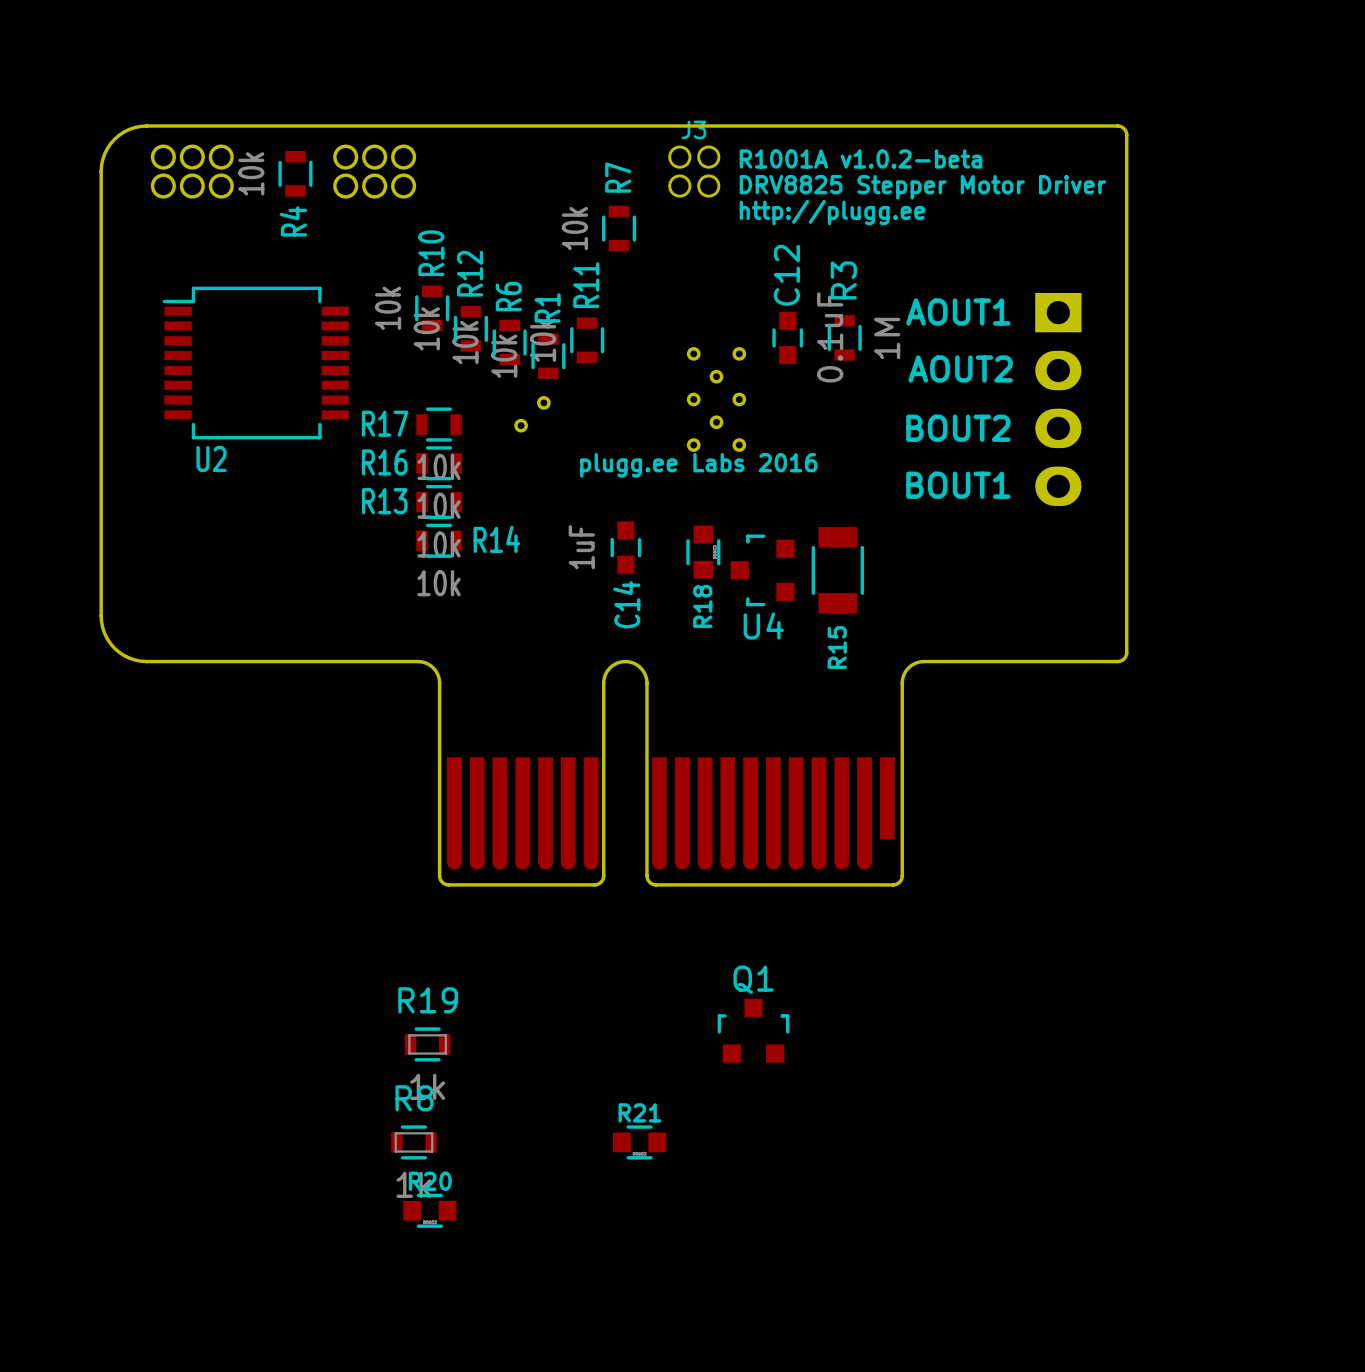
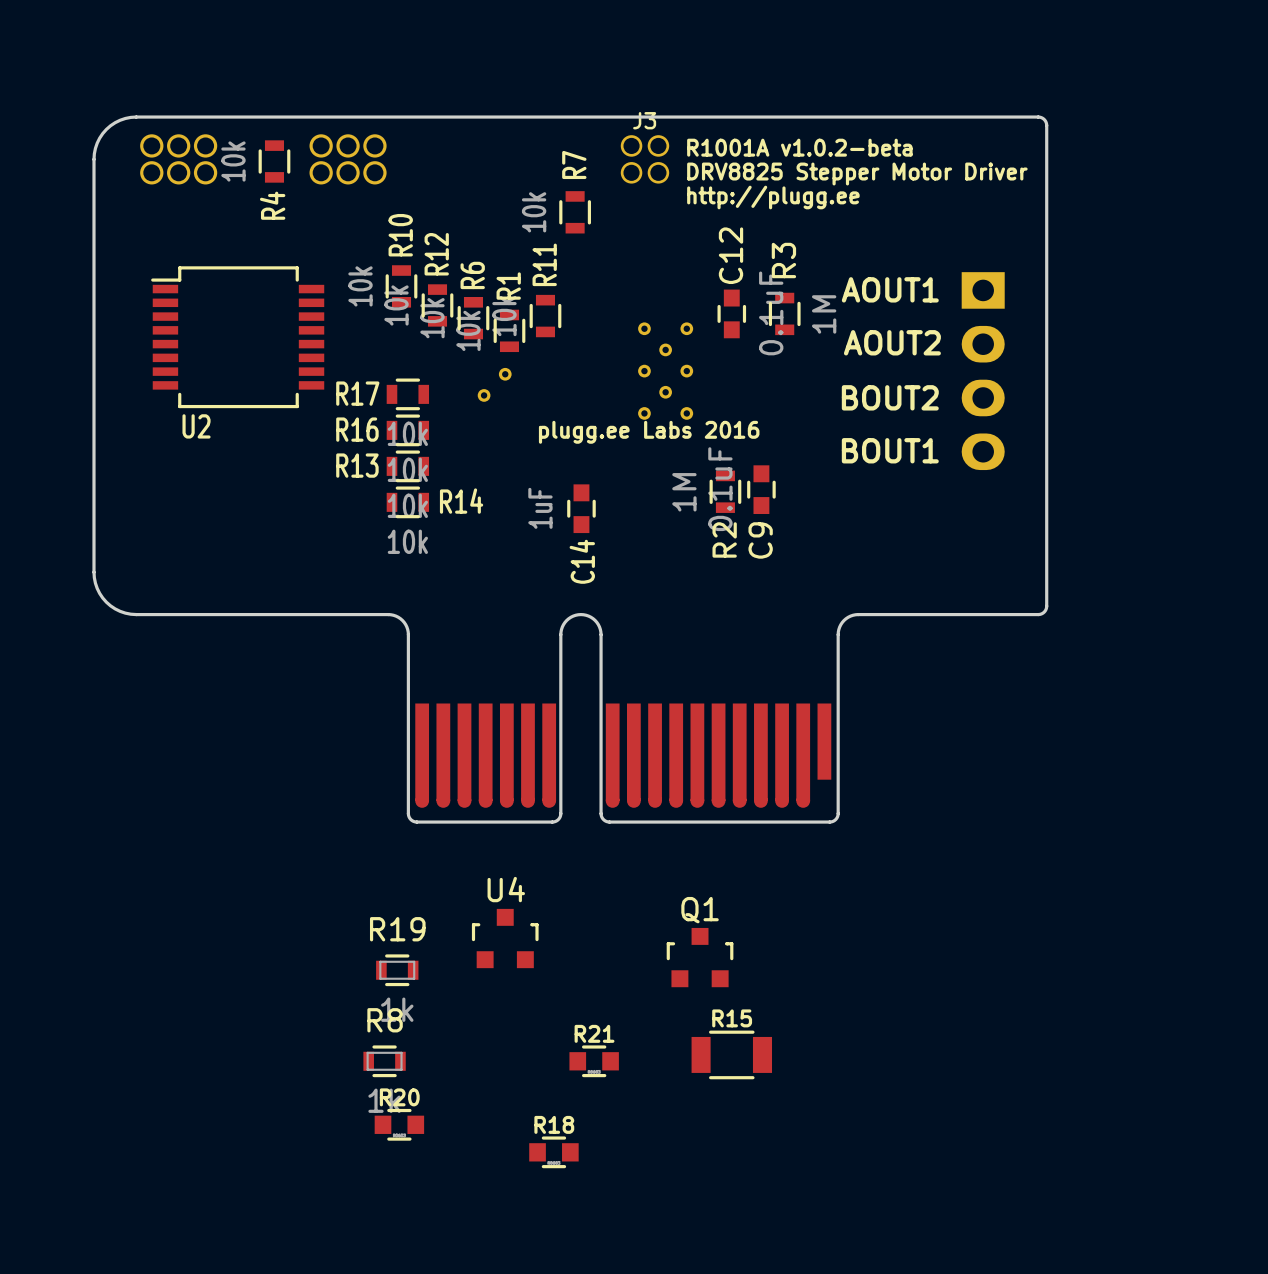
C9: none -> 0.1uF (761, 489)
R2: none -> 1M (725, 491)
R18 rotation: 0° (703, 552) -> 90° clockwise (553, 1152)
R18 position: (703, 552) -> (553, 1152)
U4 rotation: 0° (762, 570) -> 90° clockwise (505, 938)
U4 position: (762, 570) -> (505, 938)
R15 rotation: 0° (837, 570) -> 90° clockwise (731, 1054)
R15 position: (837, 570) -> (731, 1054)
R18 name position: R18 (702, 606) -> R18 (554, 1124)
U4 name position: U4 (763, 625) -> U4 (506, 889)
R15 name position: R15 (837, 647) -> R15 (732, 1018)

